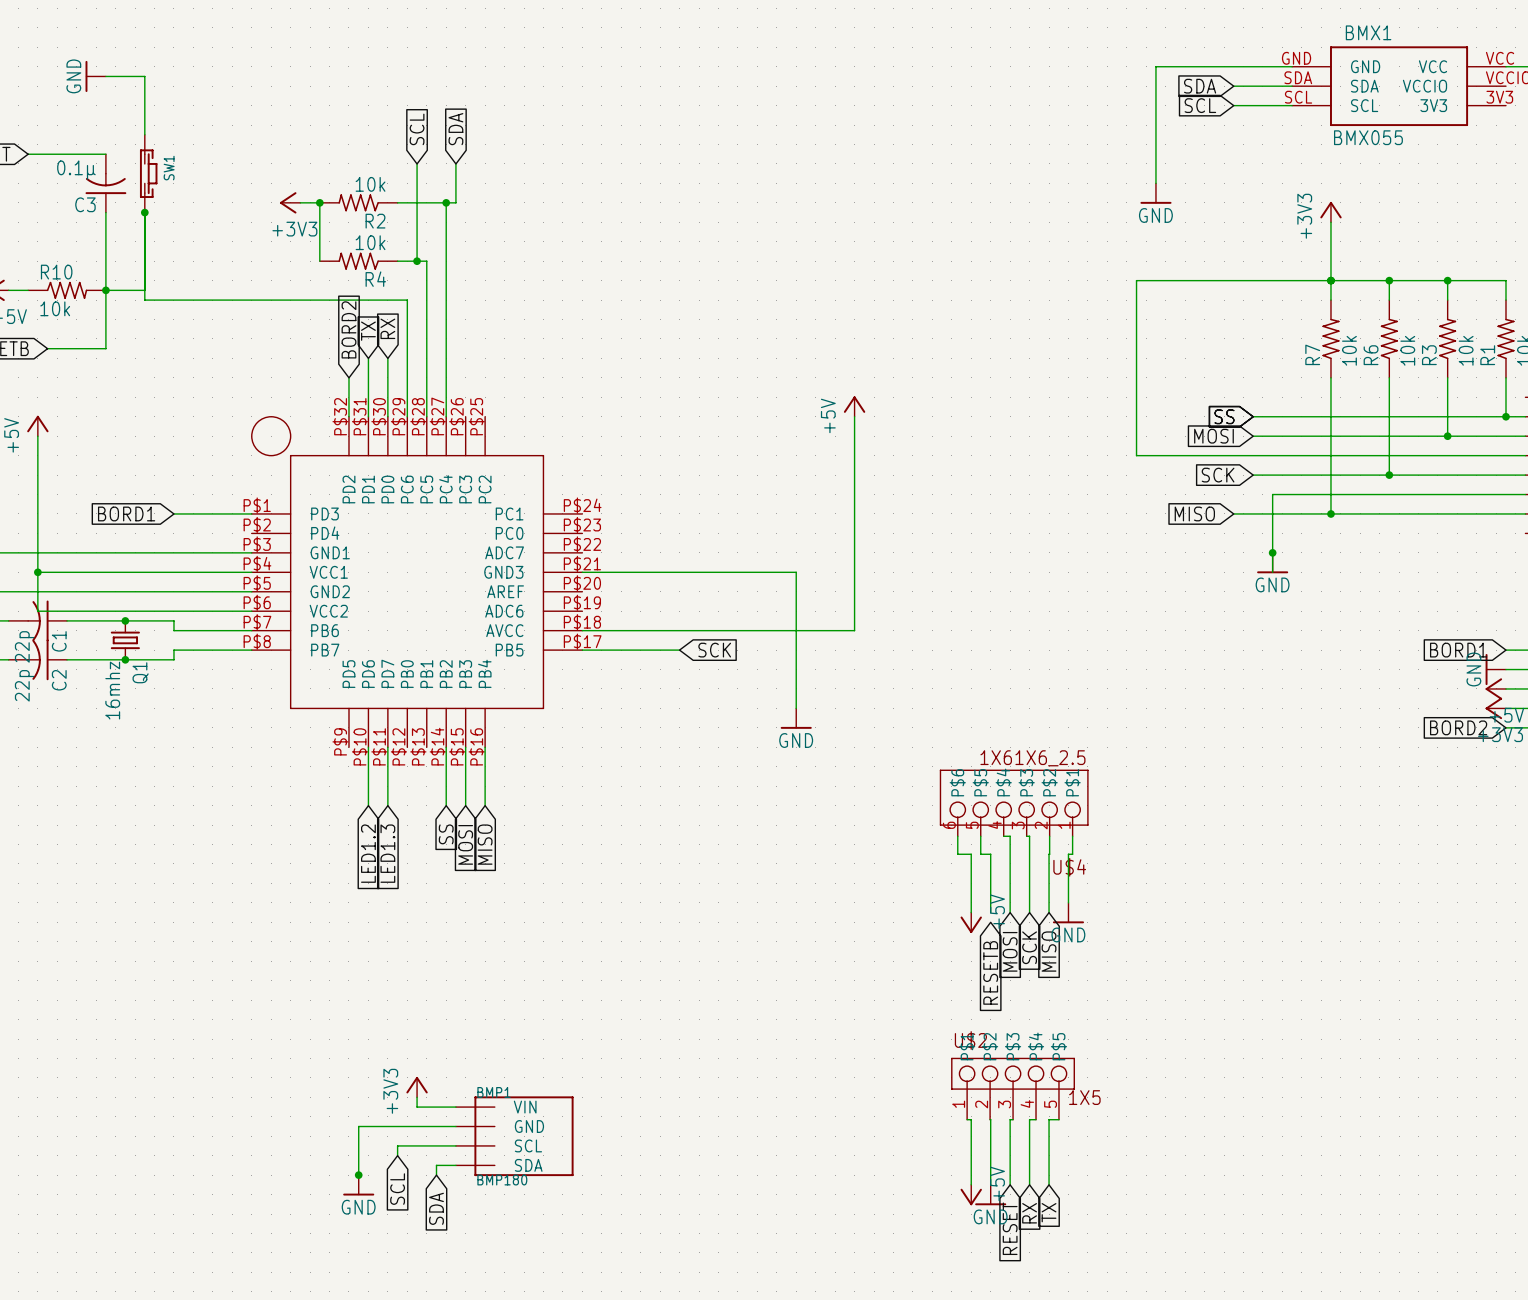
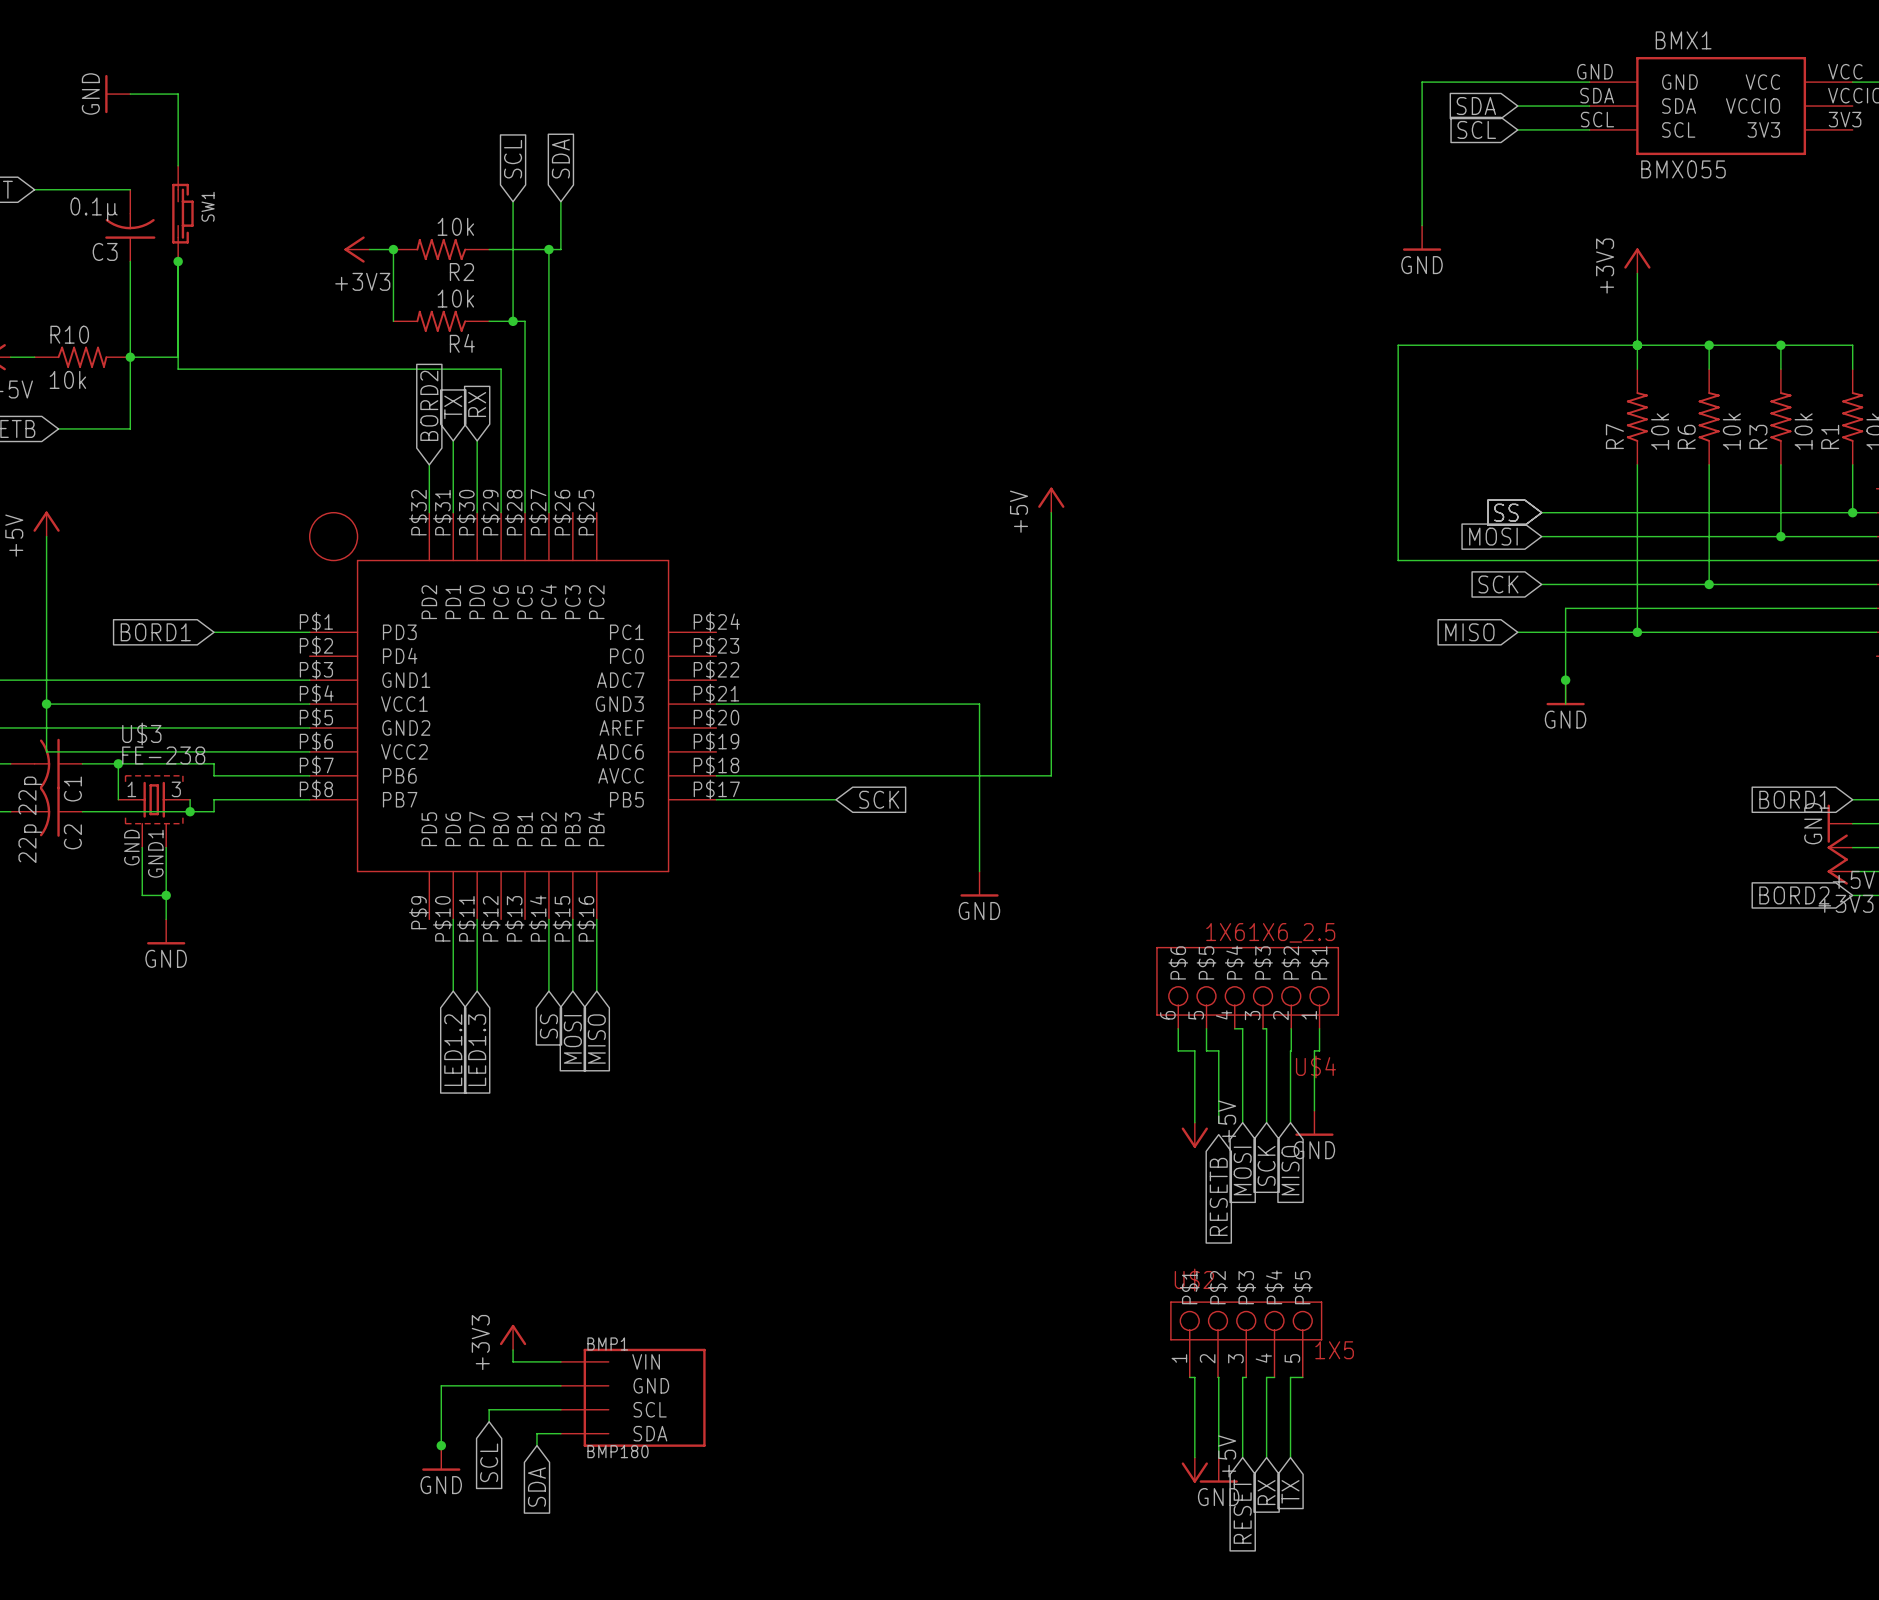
wire: none -> (118, 763) (118, 799)
junction: none -> (118, 763)
junction: (125, 620) -> none
Q1: 16mhz (125, 640) -> none
wire: none -> (190, 799) (190, 811)
U$3: none -> FE-238 (154, 811)
junction: (125, 659) -> none
junction: none -> (190, 811)
wire: none -> (142, 847) (142, 895) (166, 895)
wire: none -> (166, 847) (166, 919)
junction: none -> (166, 895)
power symbol: none -> GND (166, 931)

